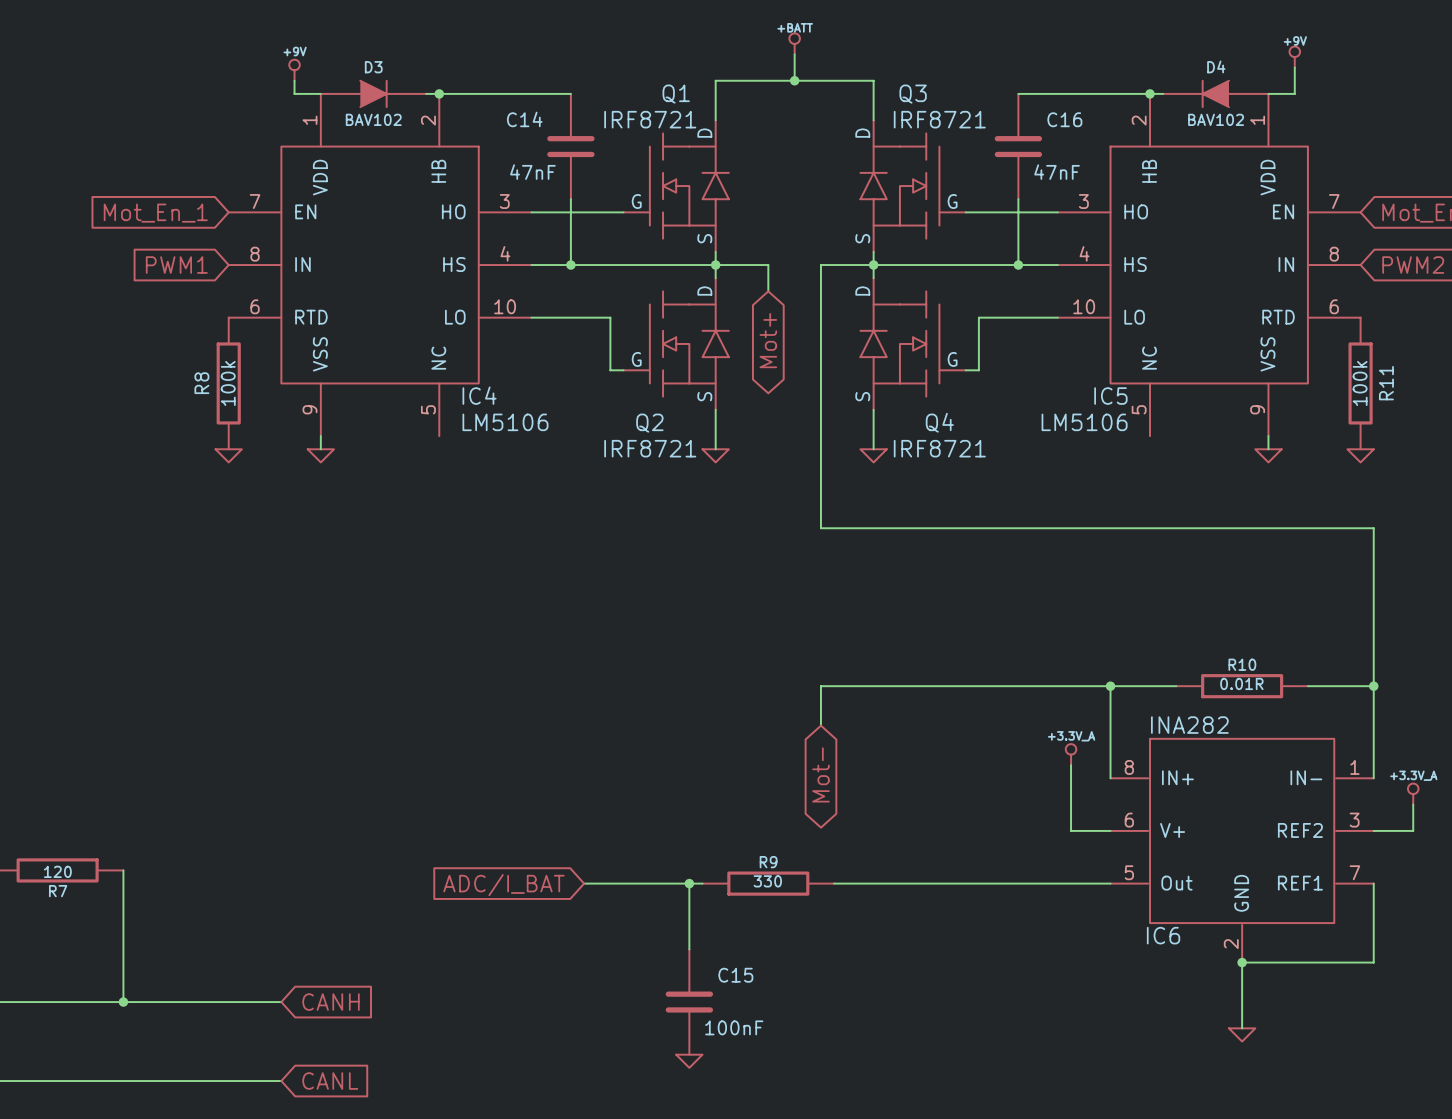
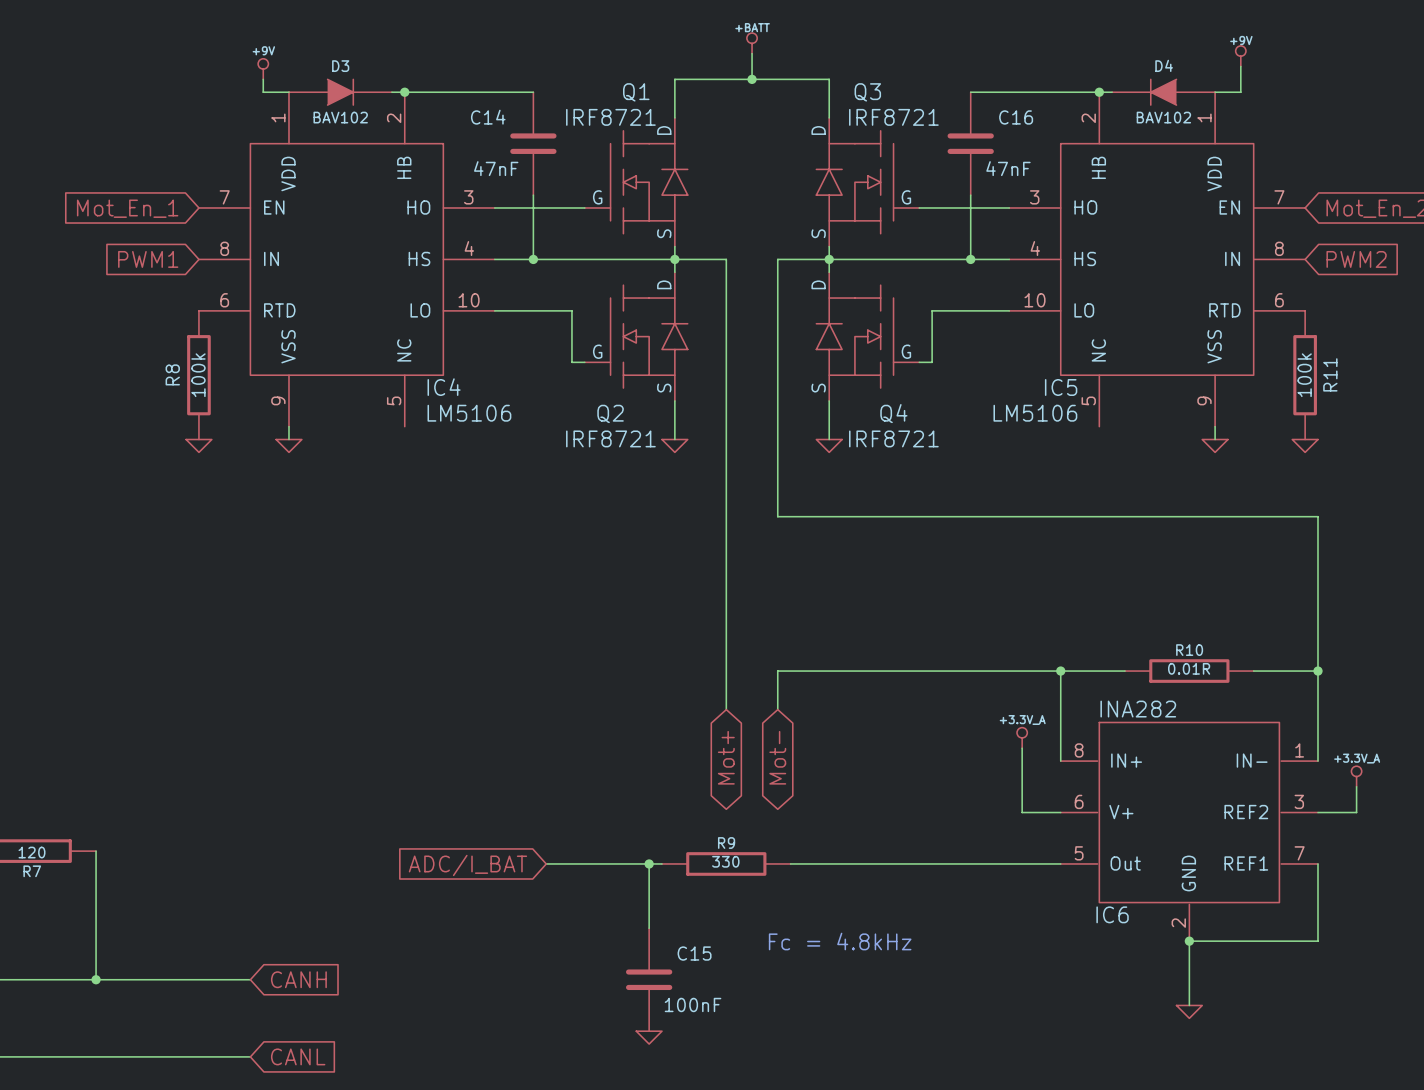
wire: none -> (726, 285) (726, 709)
global label: Mot+ (768, 340) -> none
global label: none -> Mot+ (726, 757)
text: none -> Fc = 4.8kHz (840, 941)

